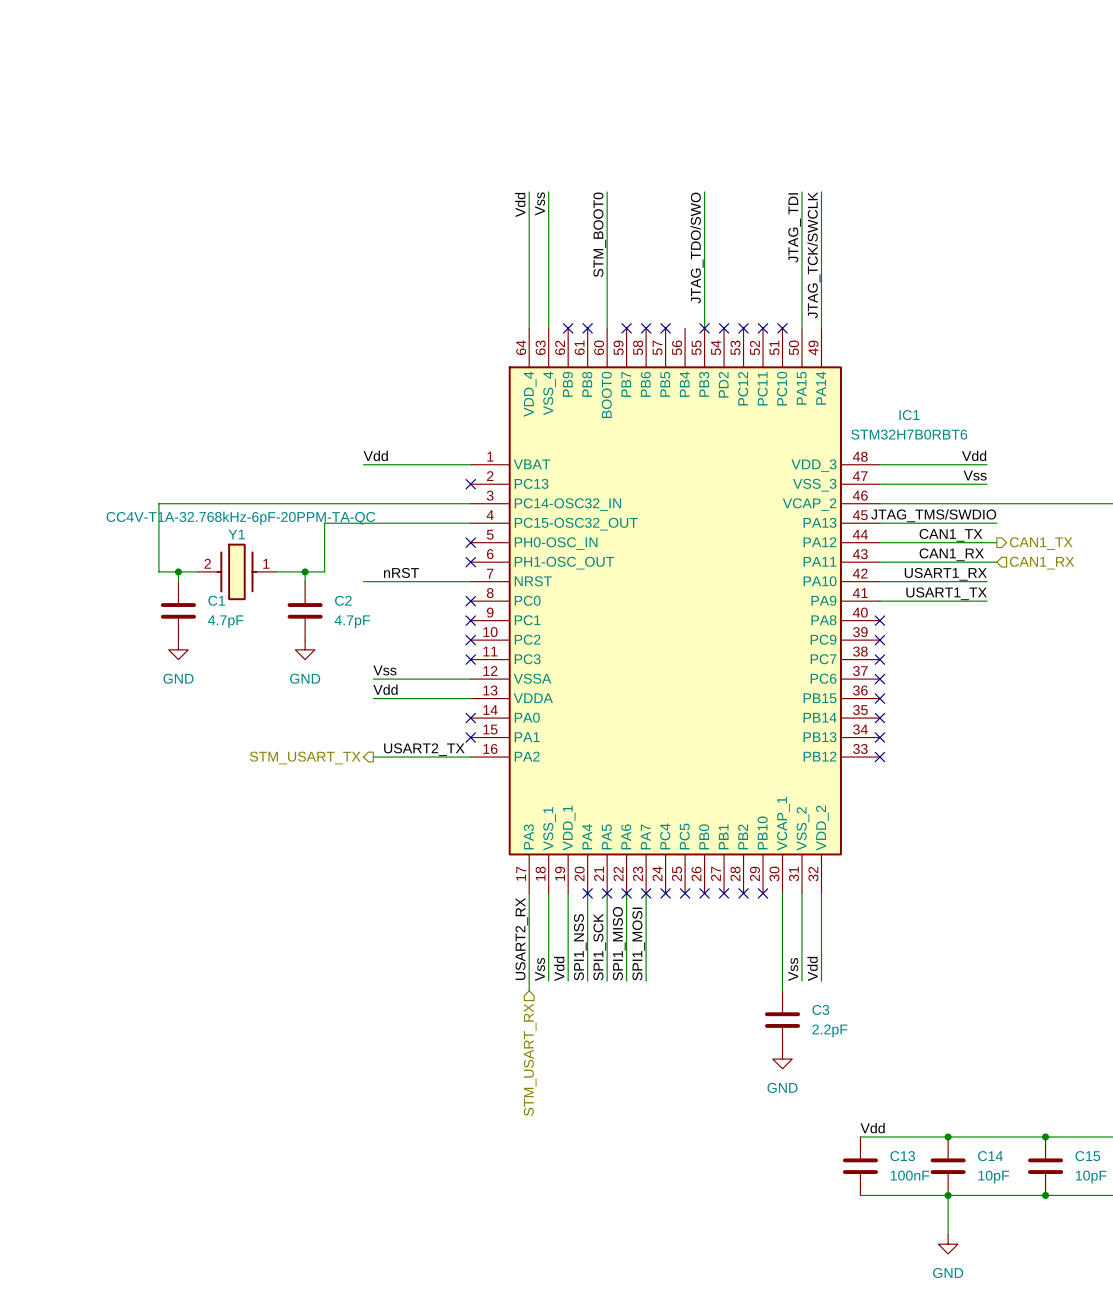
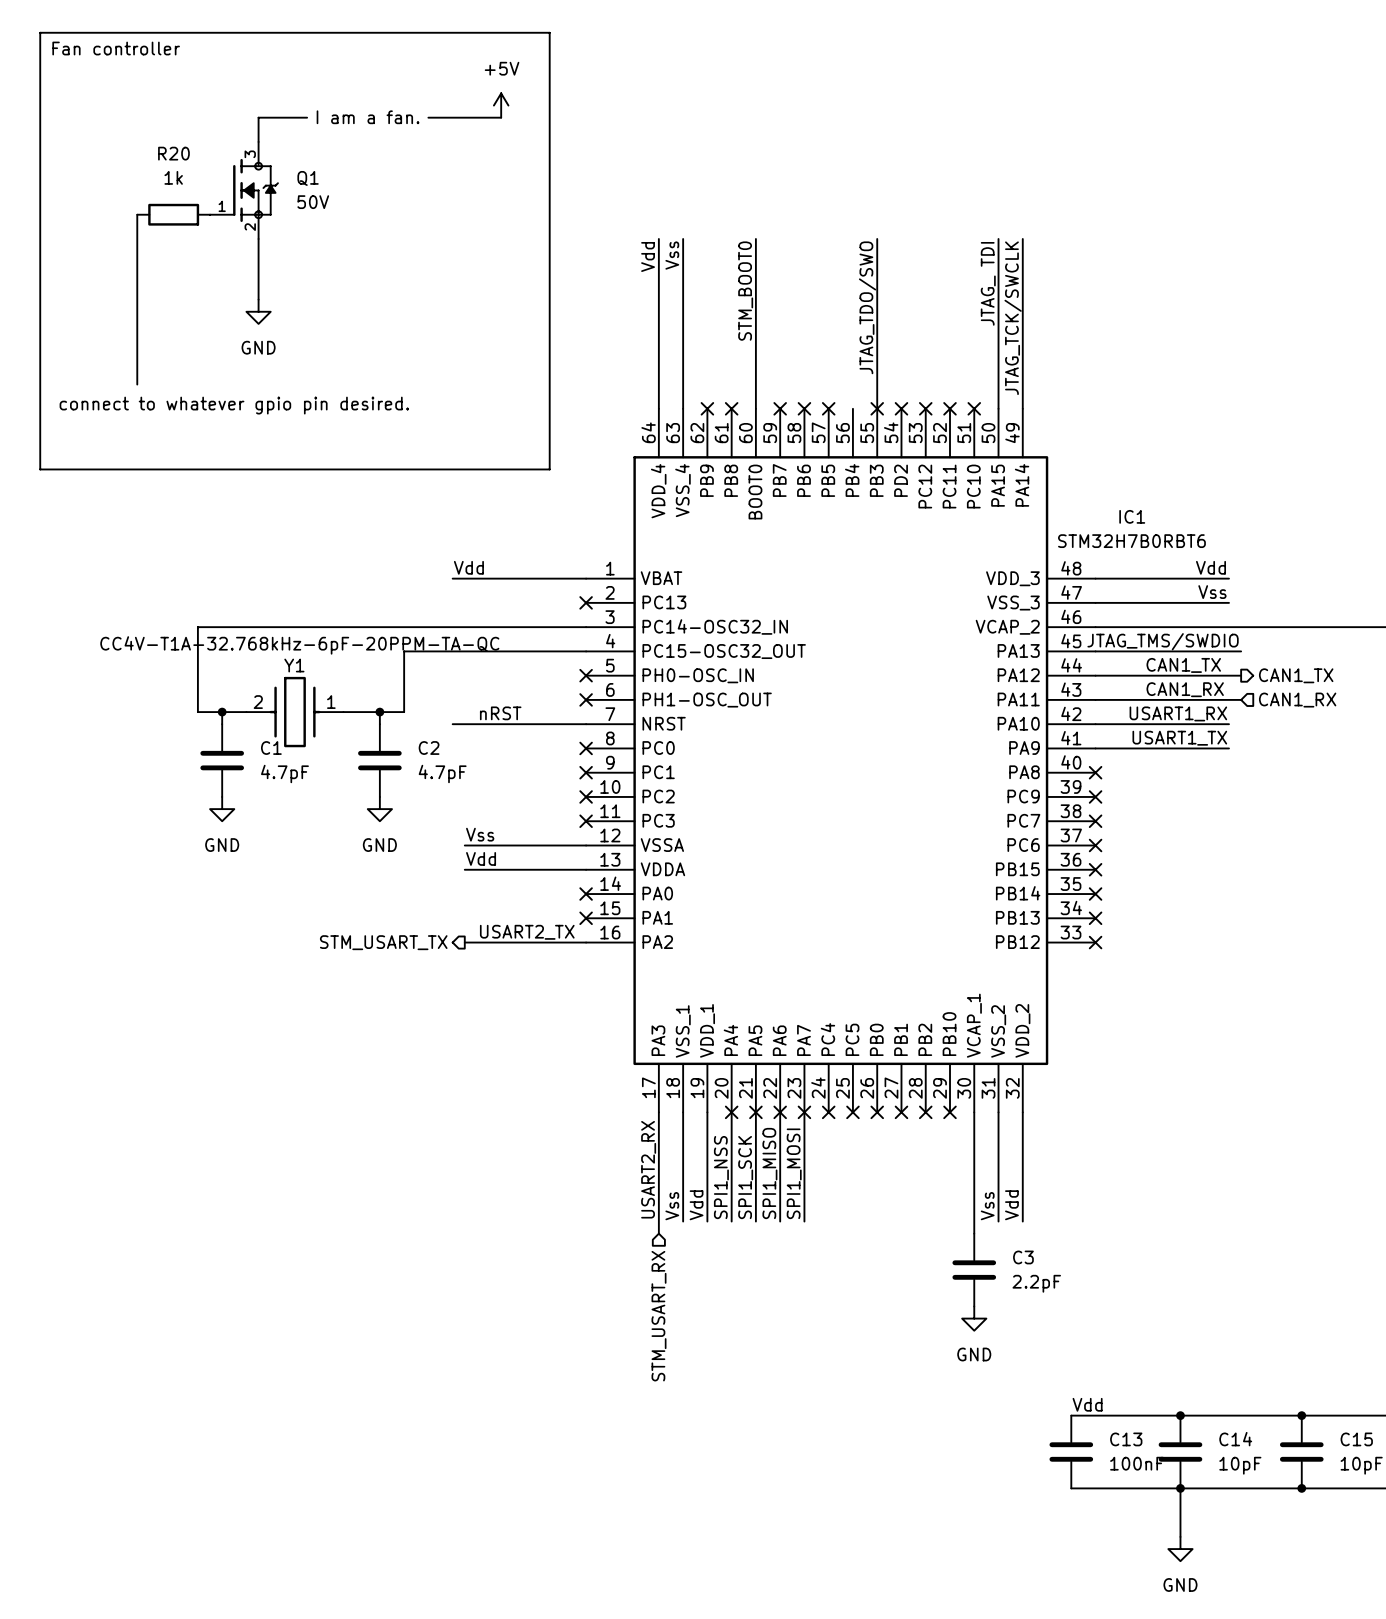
line: none -> (40, 32) (549, 32) (549, 469) (40, 469) (40, 32)
text: none -> Fan controller (116, 48)
power symbol: none -> +5V (501, 105)
wire: none -> (307, 117) (258, 117) (258, 141)
text: none -> I am a fan. (368, 117)
wire: none -> (428, 117) (501, 117)
Q1: none -> 50V (244, 190)
wire: none -> (137, 214) (137, 384)
R20: none -> 1k (173, 214)
wire: none -> (258, 238) (258, 299)
power symbol: none -> GND (258, 311)
text: none -> connect to whatever gpio pin desired. (234, 405)

